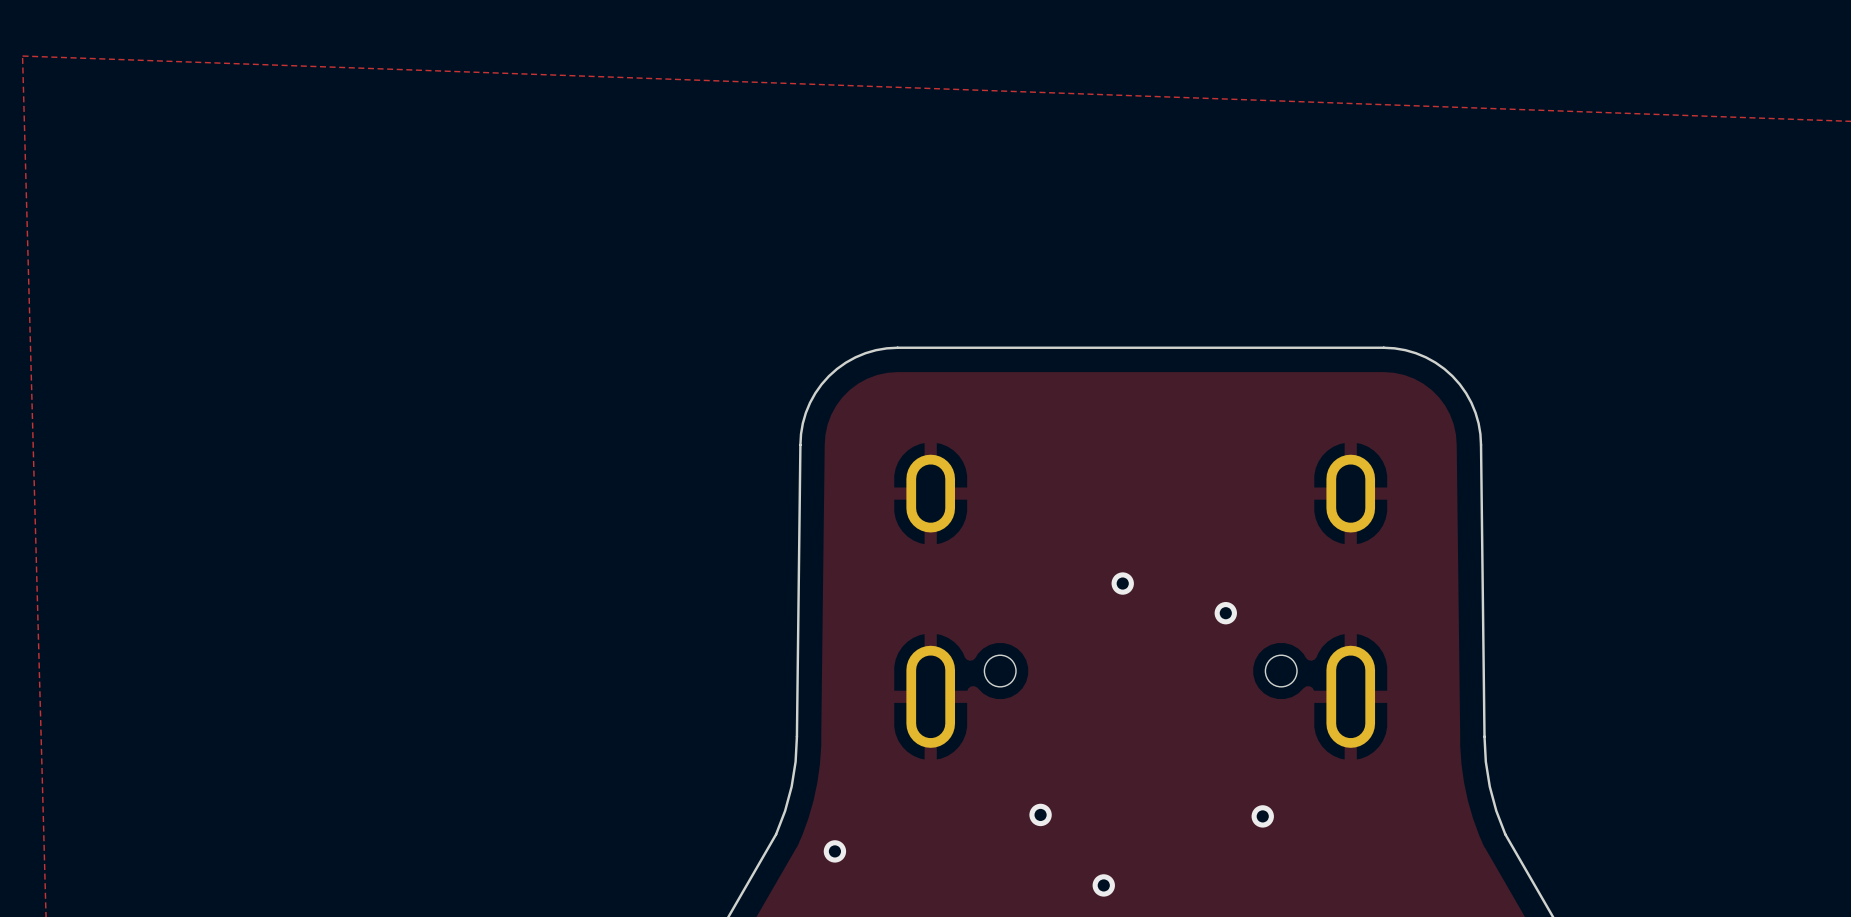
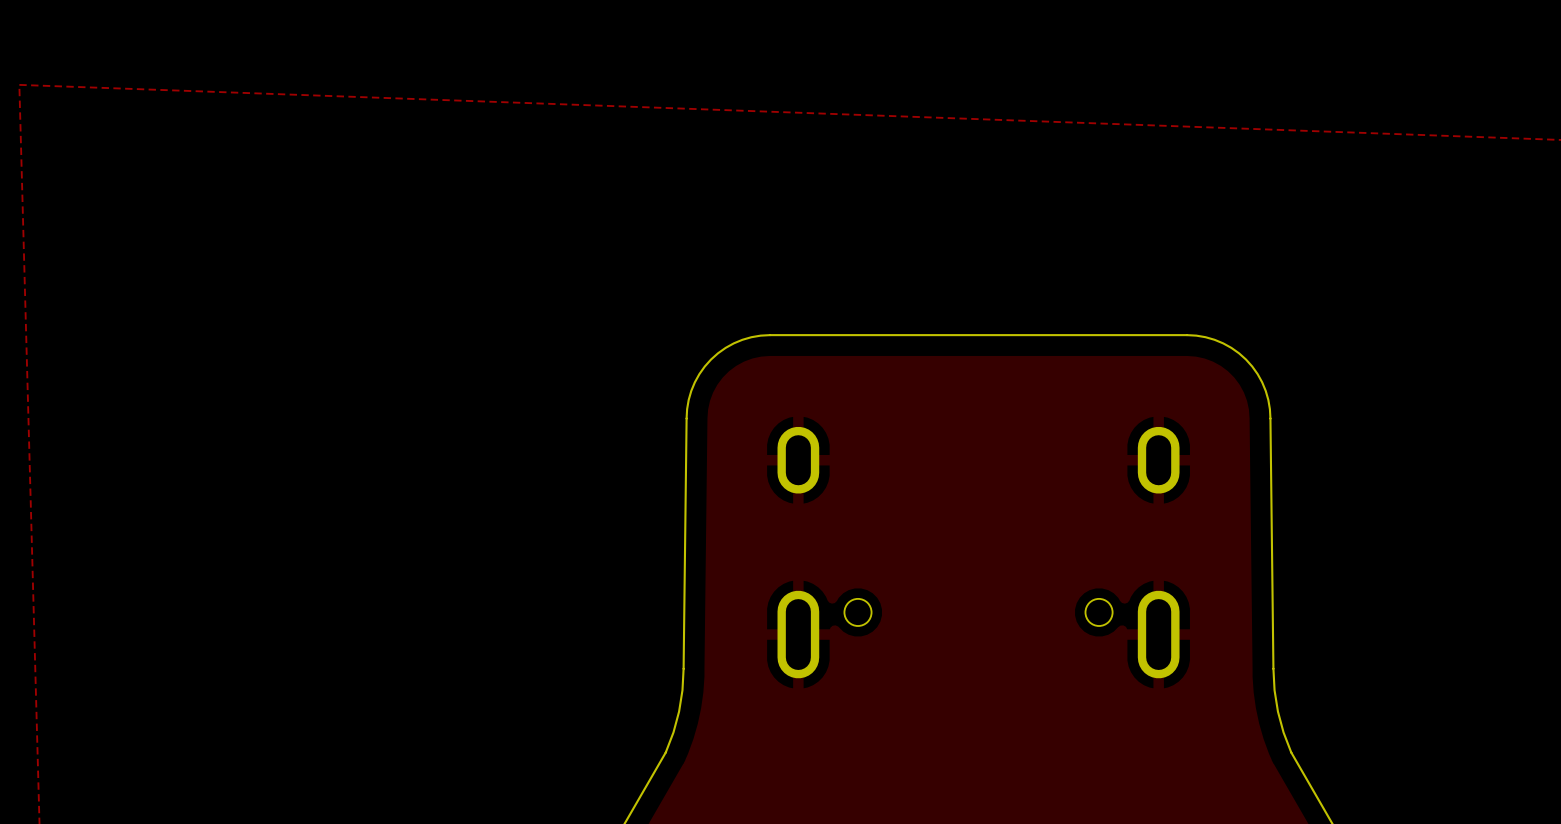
via: (1122, 583) -> none
via: (1225, 613) -> none
via: (1040, 814) -> none
via: (1262, 816) -> none
via: (834, 851) -> none
via: (1103, 885) -> none

